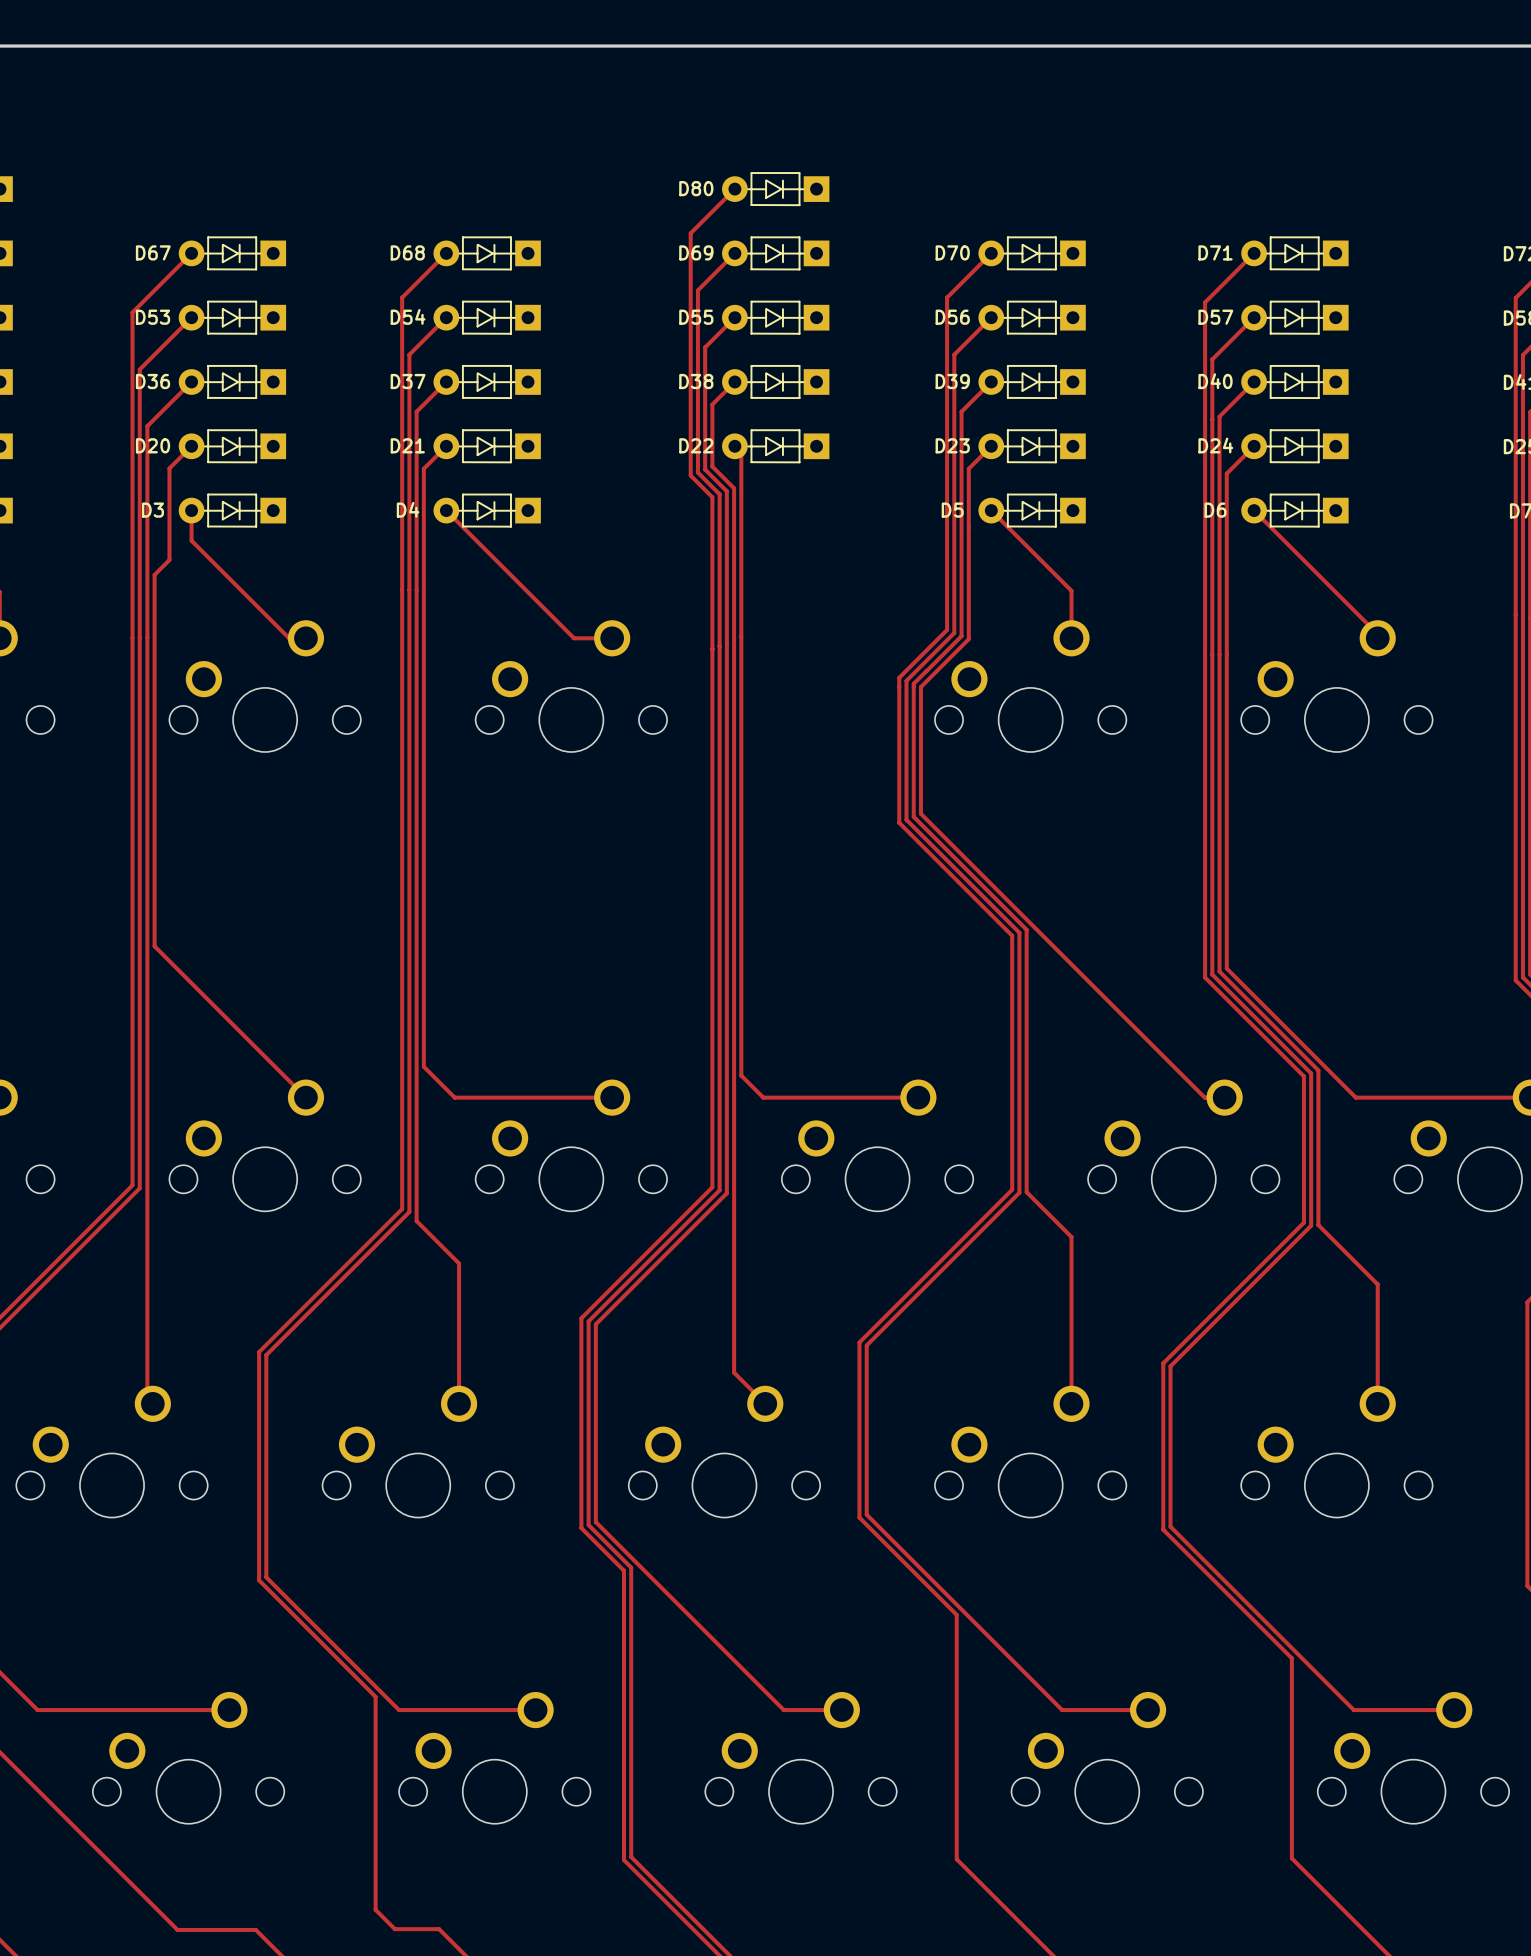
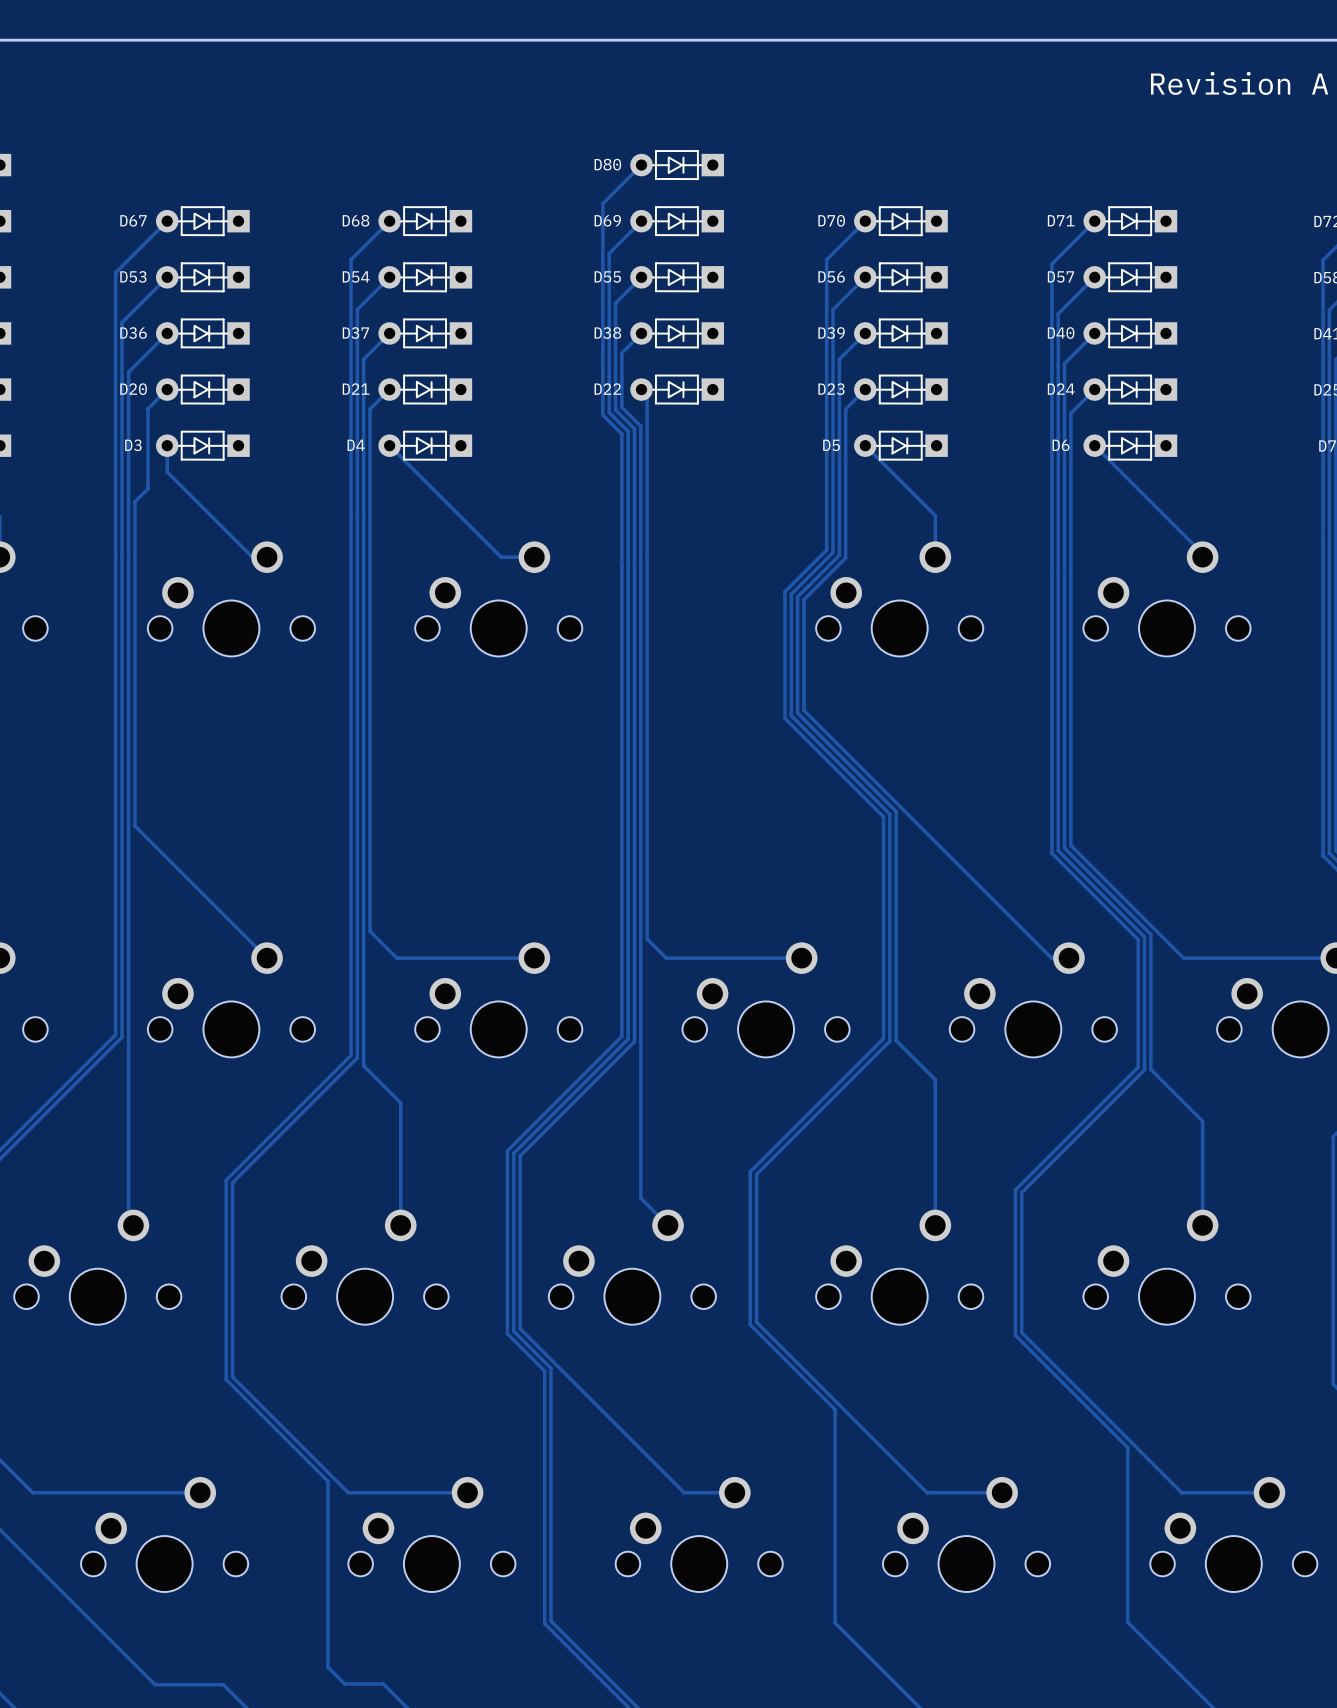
text: none -> Revision A (1239, 83)

